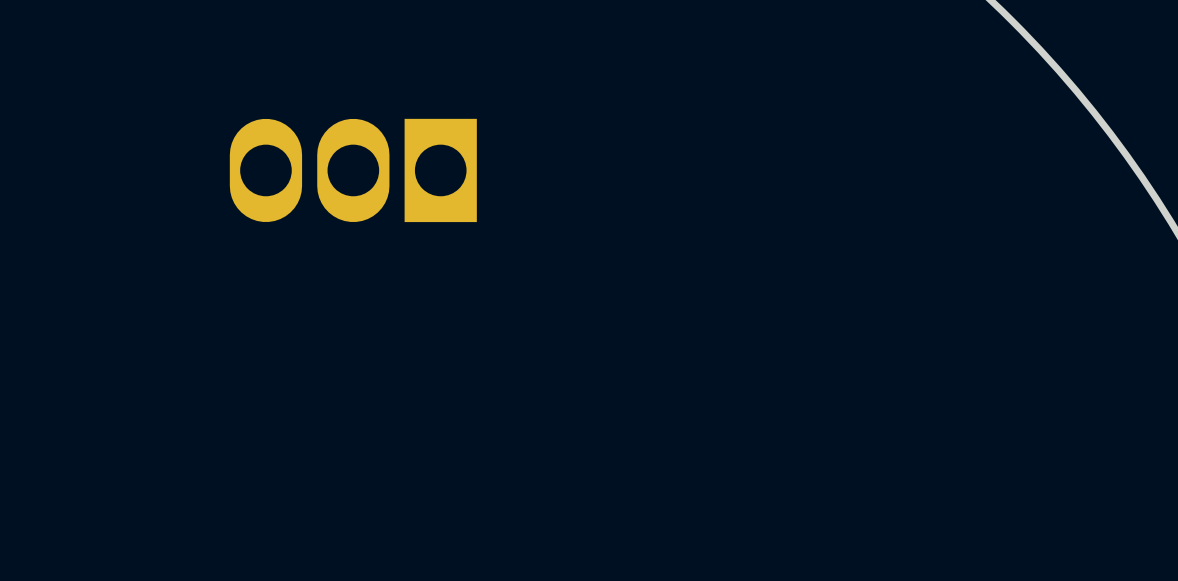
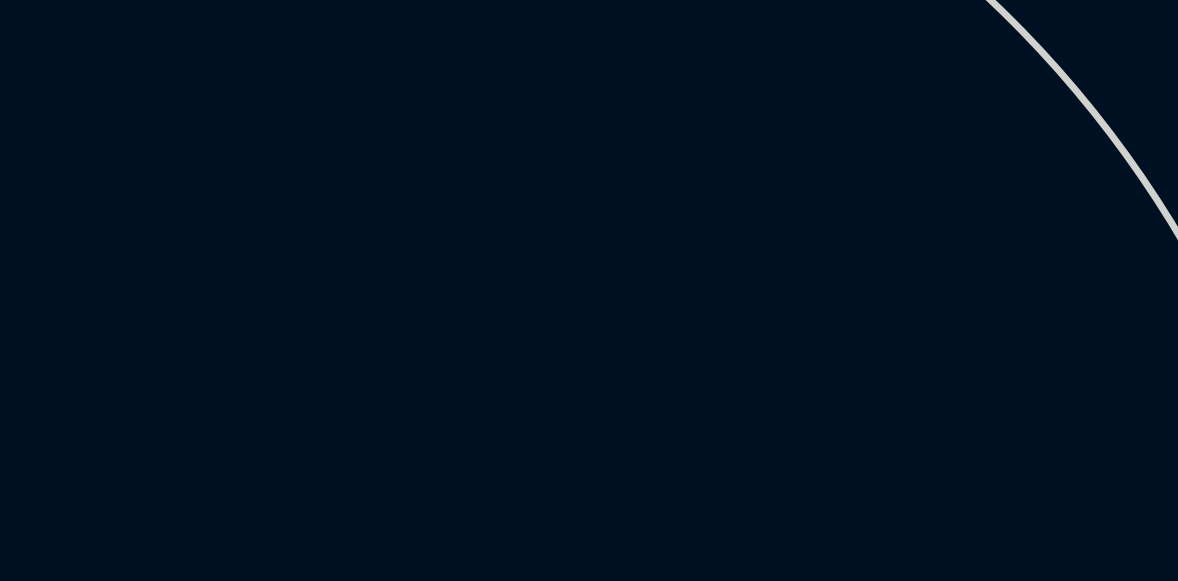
part: (353, 170) -> none

